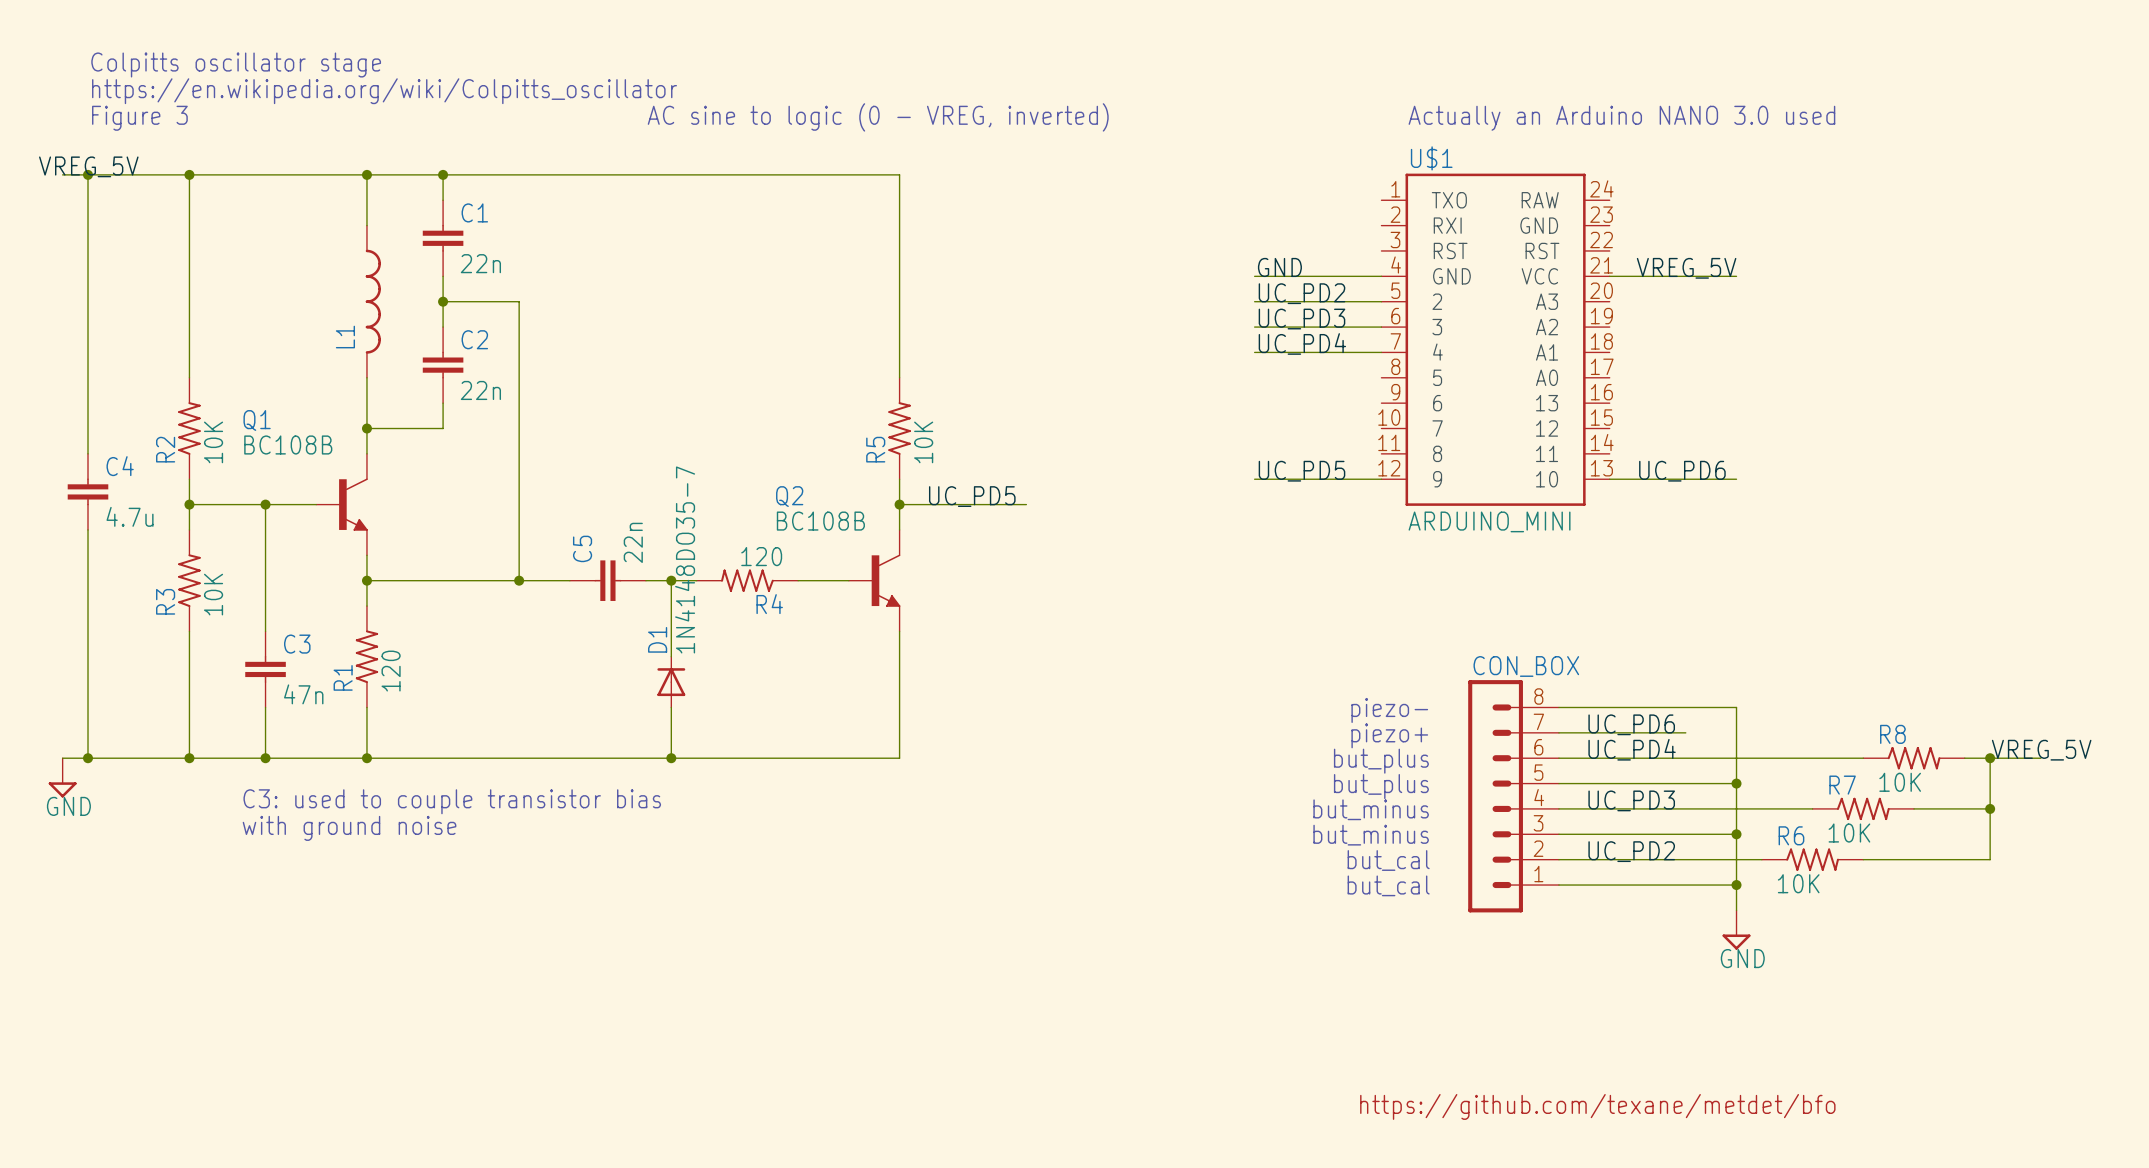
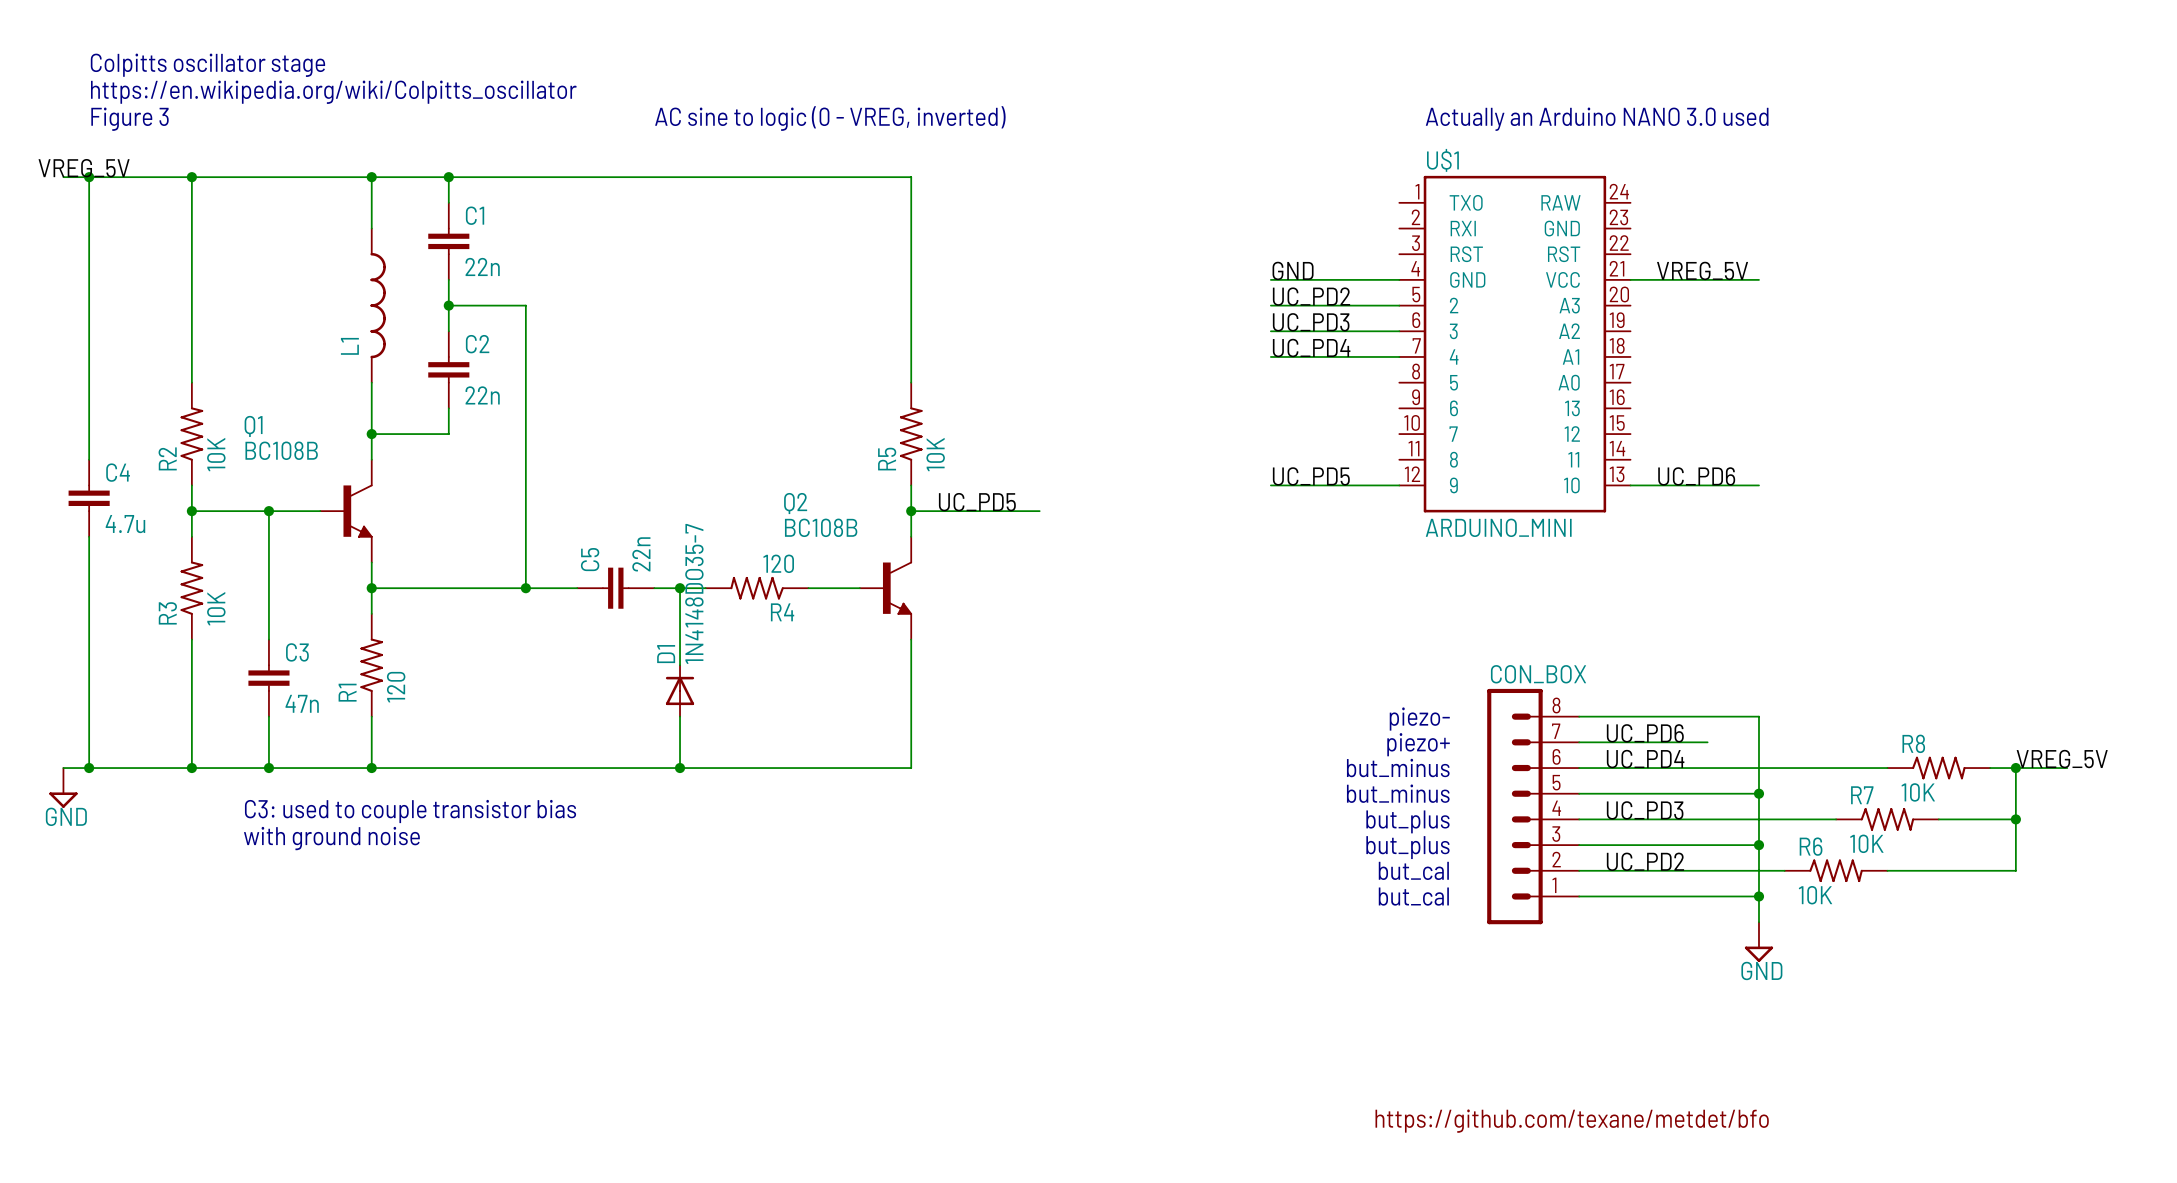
text: but_plus (1381, 761) -> but_minus (1398, 768)
text: but_plus (1381, 786) -> but_minus (1398, 793)
text: but_minus (1371, 809) -> but_plus (1407, 821)
text: but_minus (1371, 835) -> but_plus (1407, 847)

